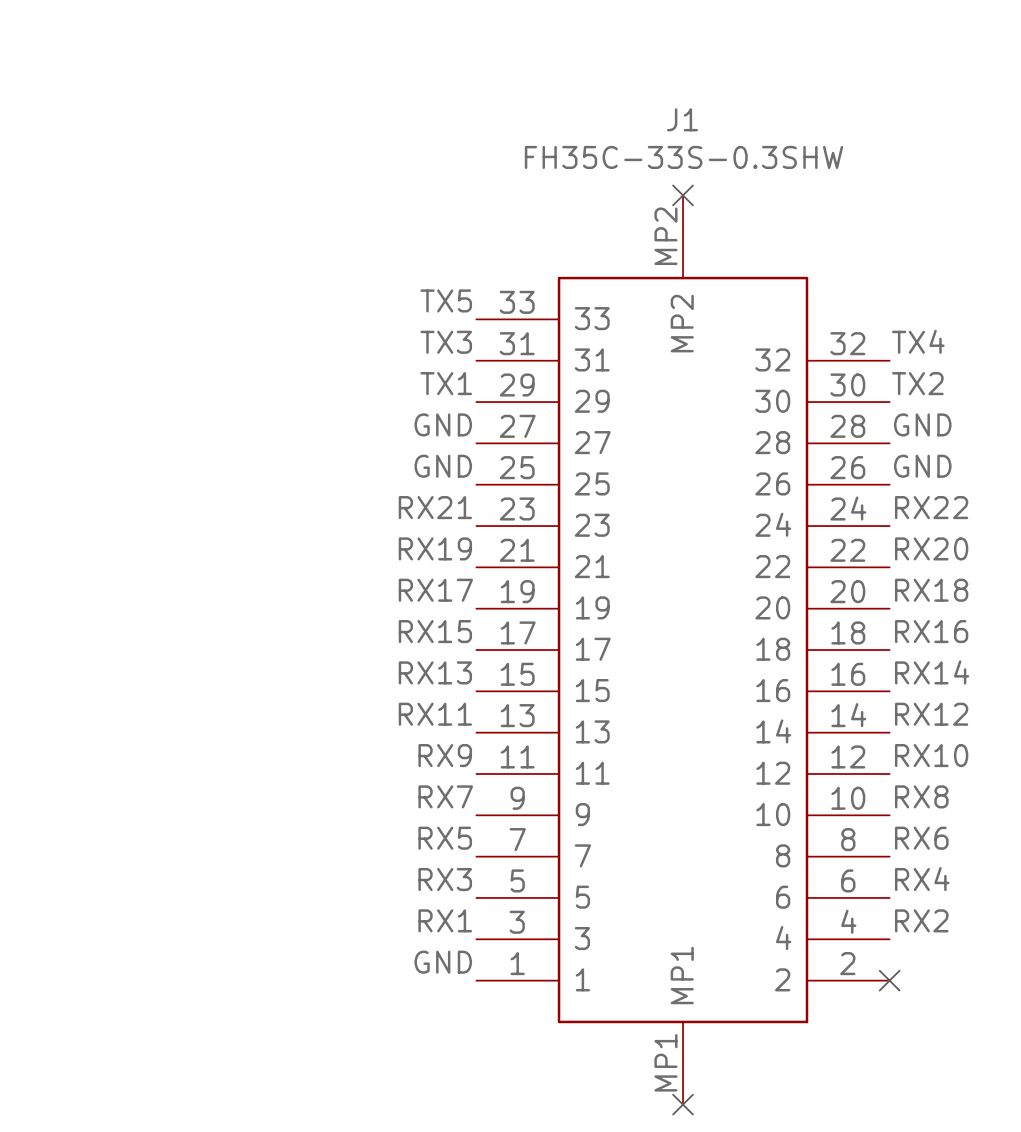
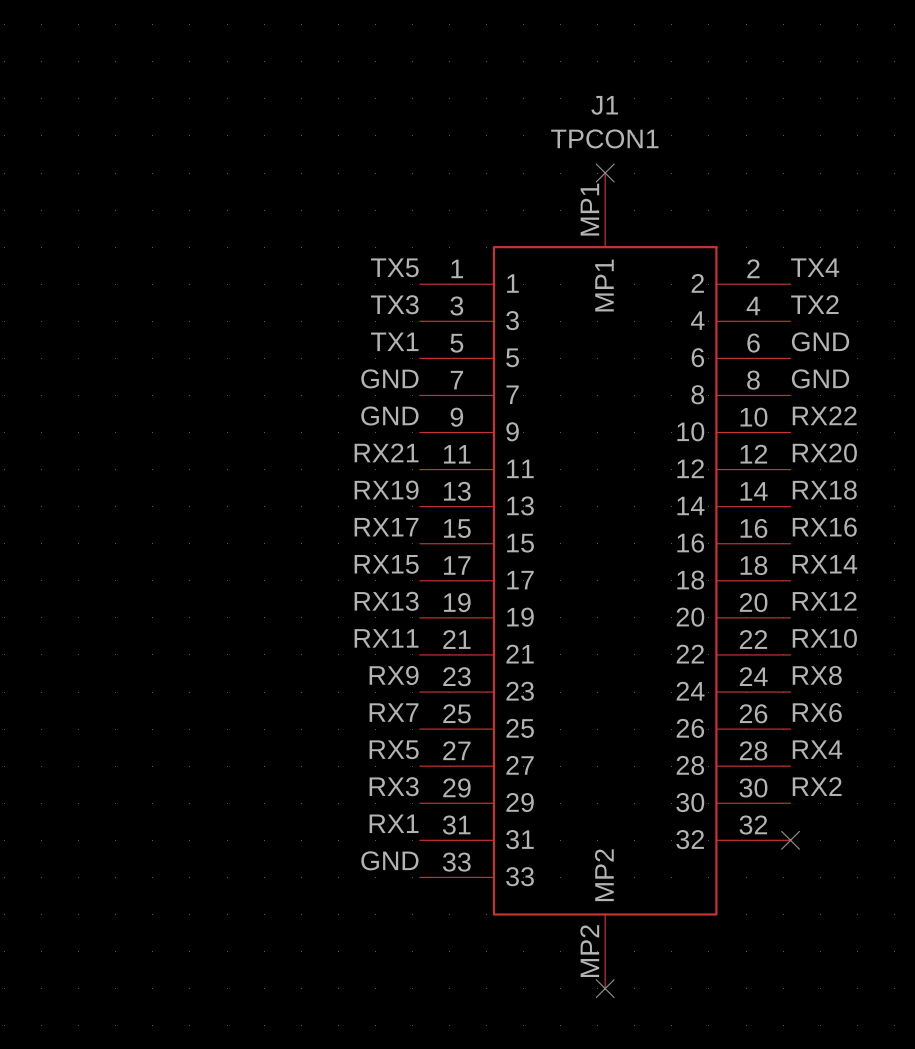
J1 value: FH35C-33S-0.3SHW (683, 157) -> TPCON1 (604, 138)
label: none -> TX4 (815, 267)
label: TX4 (918, 341) -> TX2 (814, 304)
label: TX2 (917, 383) -> GND (820, 341)
label: GND (922, 466) -> RX22 (824, 415)
label: RX22 (931, 507) -> RX20 (824, 453)
label: RX20 (931, 548) -> RX18 (824, 490)
label: RX18 (931, 590) -> RX16 (824, 527)
label: RX16 (931, 631) -> RX14 (824, 564)
J1 flip: as is (683, 650) -> up-down (605, 580)
label: RX14 (932, 672) -> RX12 (824, 601)
label: RX12 (931, 714) -> RX10 (824, 638)
label: RX10 (931, 755) -> RX8 (817, 675)
label: RX8 (921, 796) -> RX6 (817, 712)
label: RX6 (921, 838) -> RX4 (817, 749)
label: RX4 (922, 879) -> RX2 (817, 786)
label: RX2 (921, 920) -> none
no-connect mark position: (889, 980) -> (790, 840)

